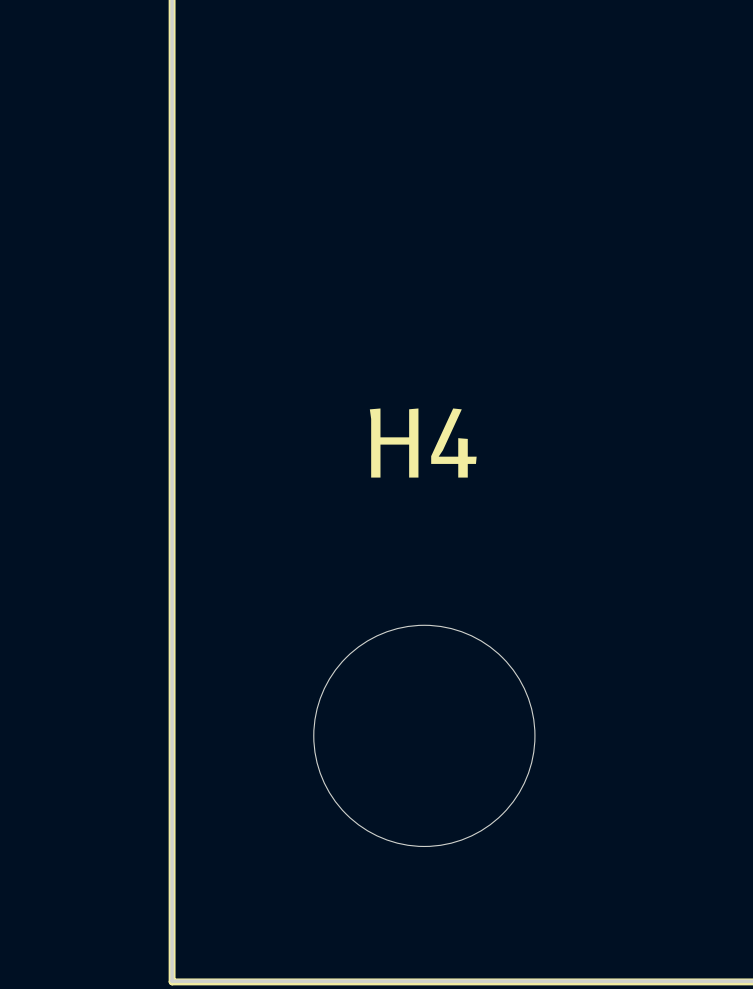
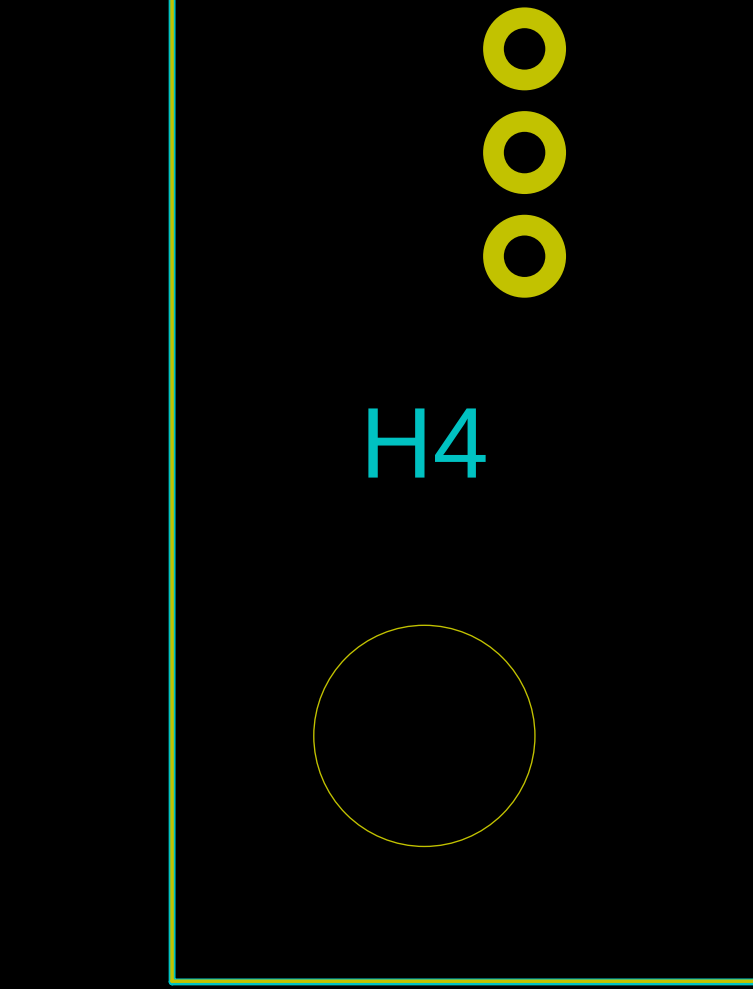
part: none -> (524, 152)

